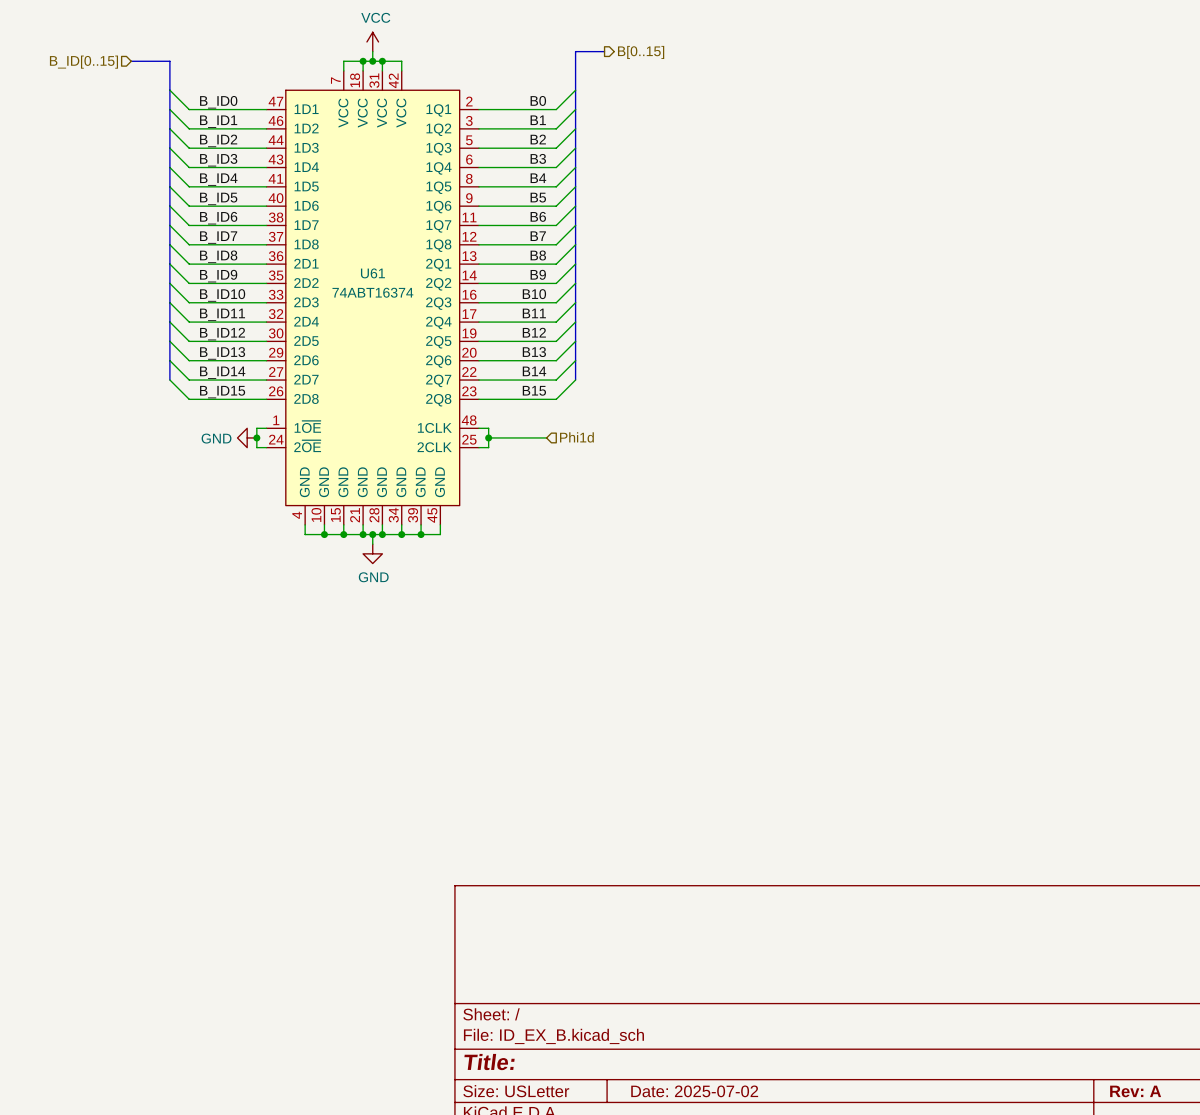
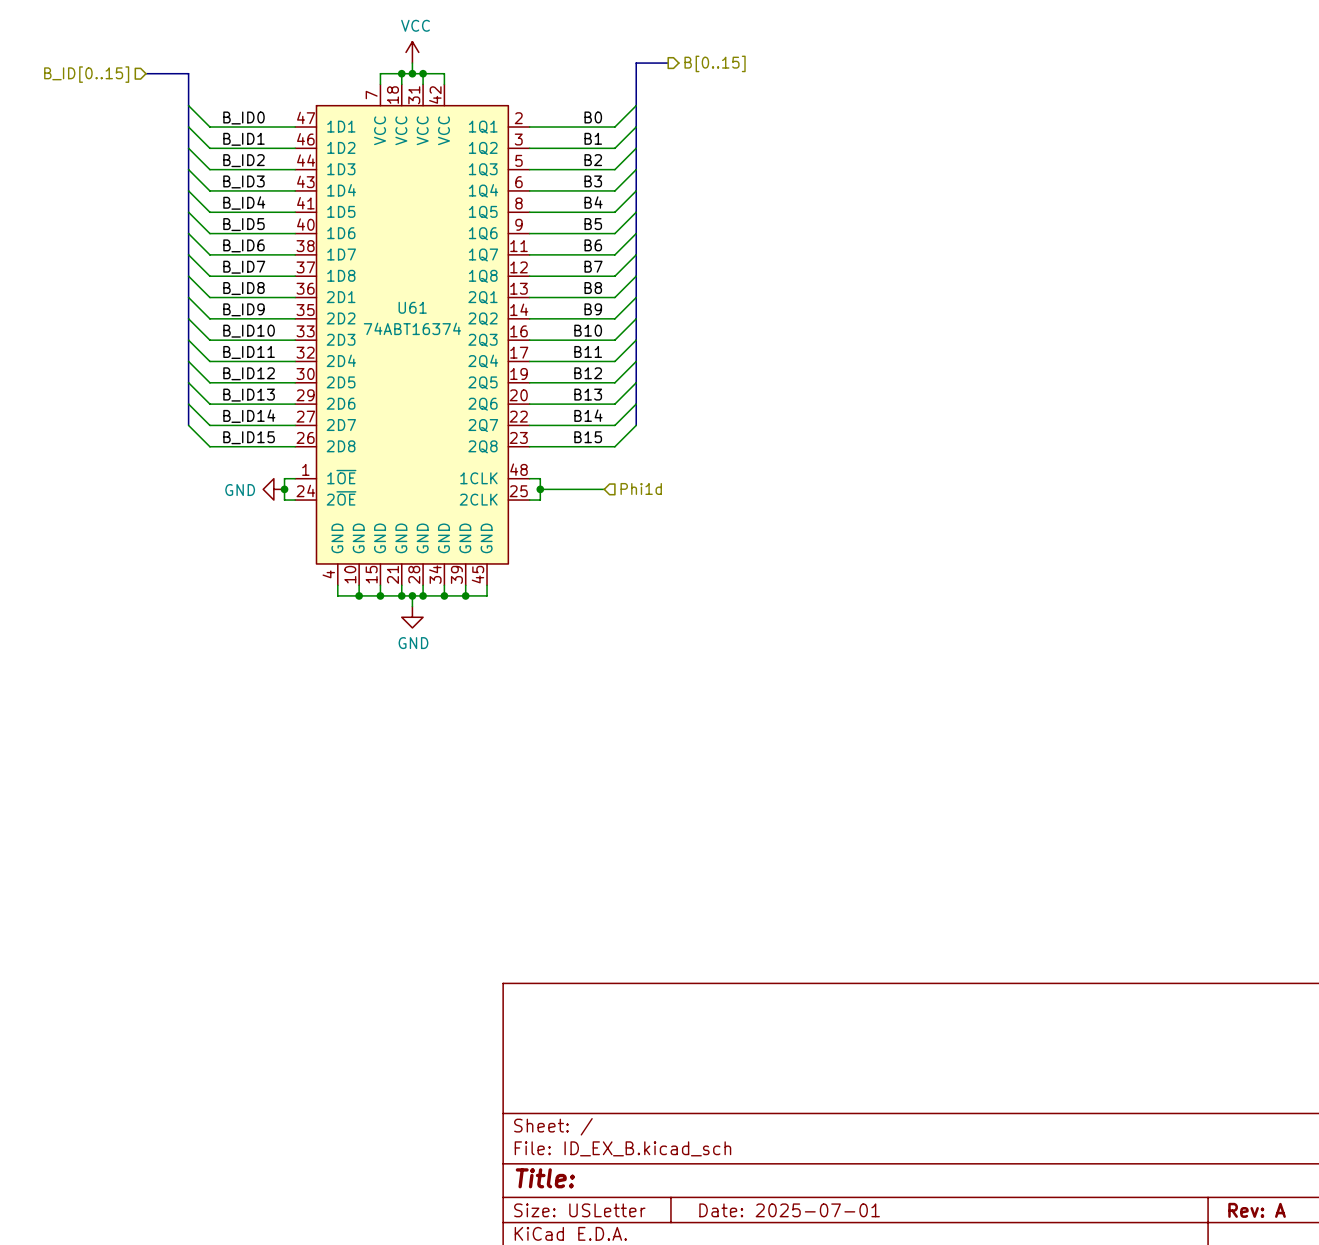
title block: Date: 2025-07-02 (694, 1091) -> Date: 2025-07-01 (789, 1210)

